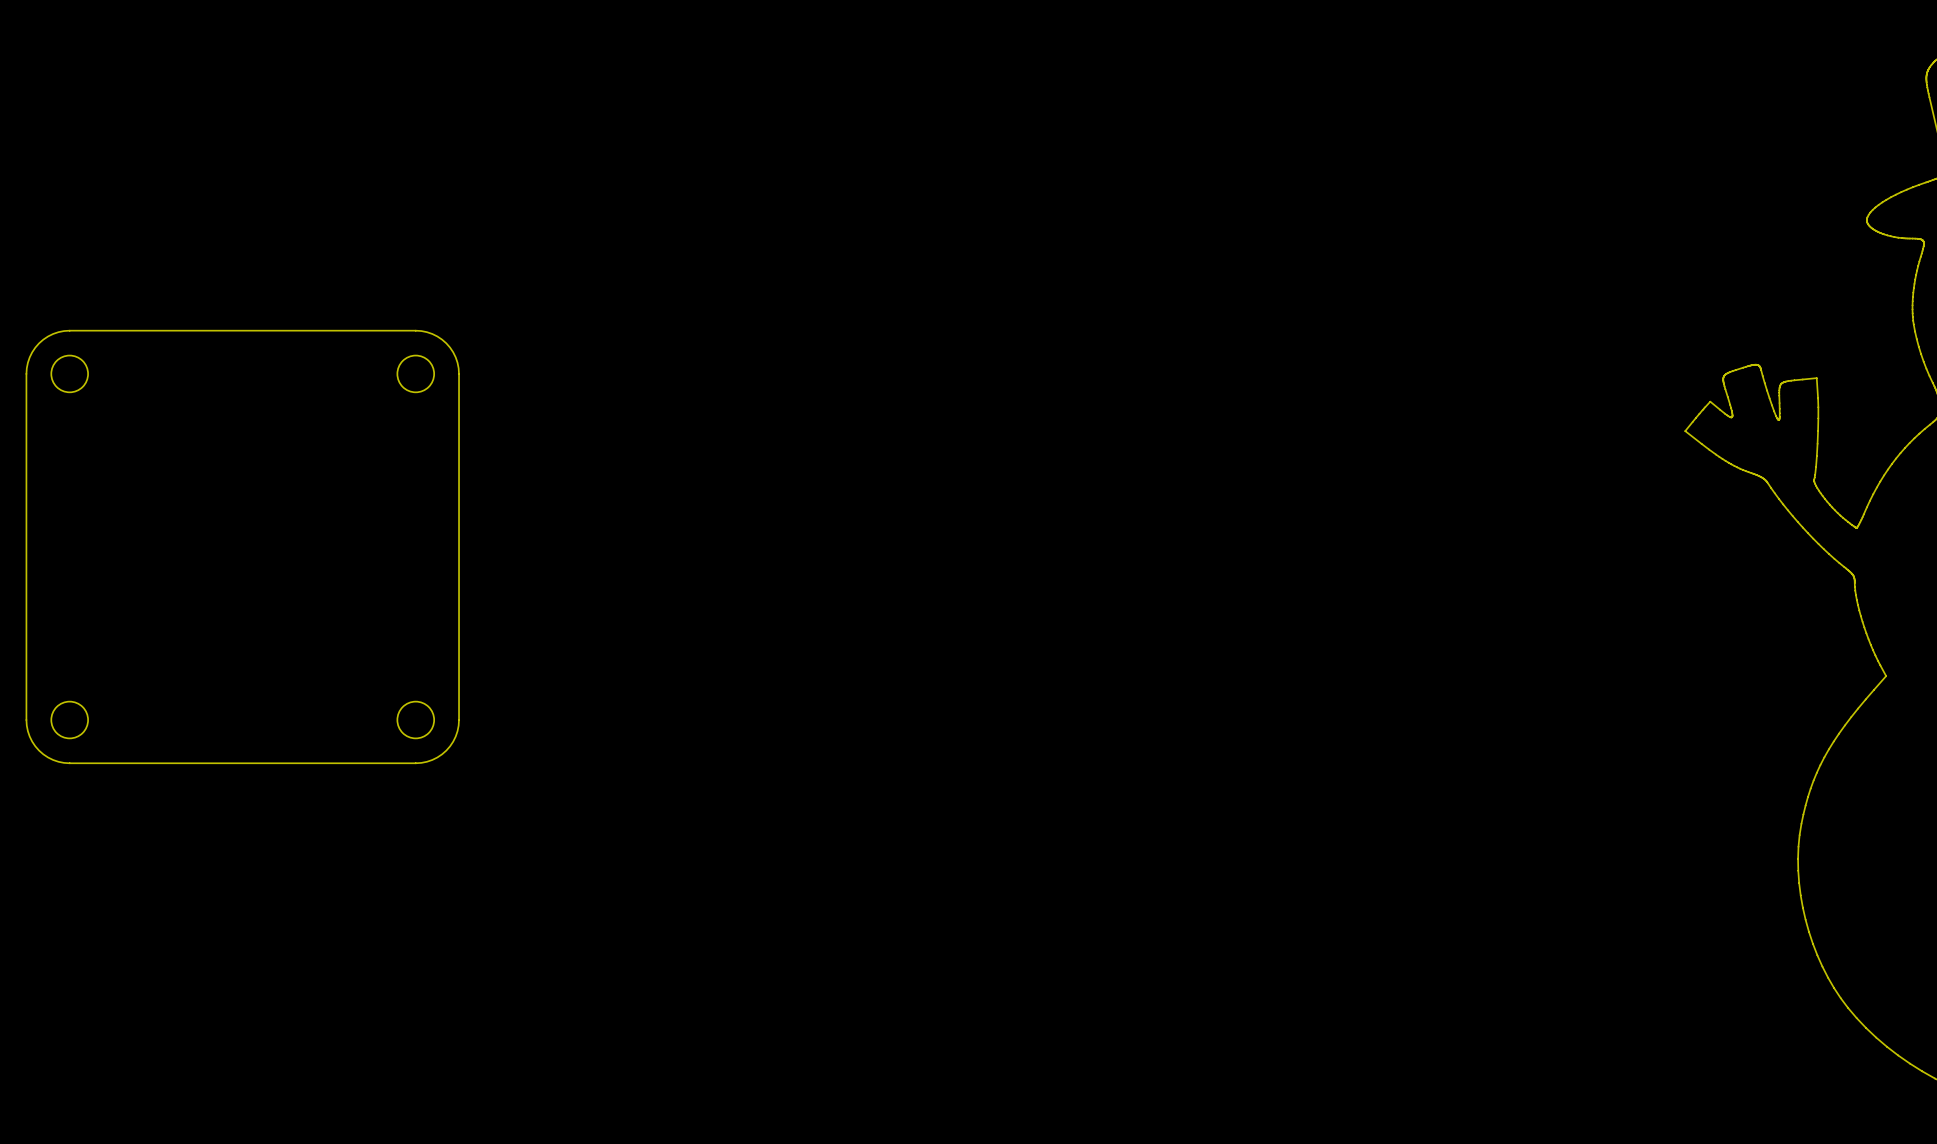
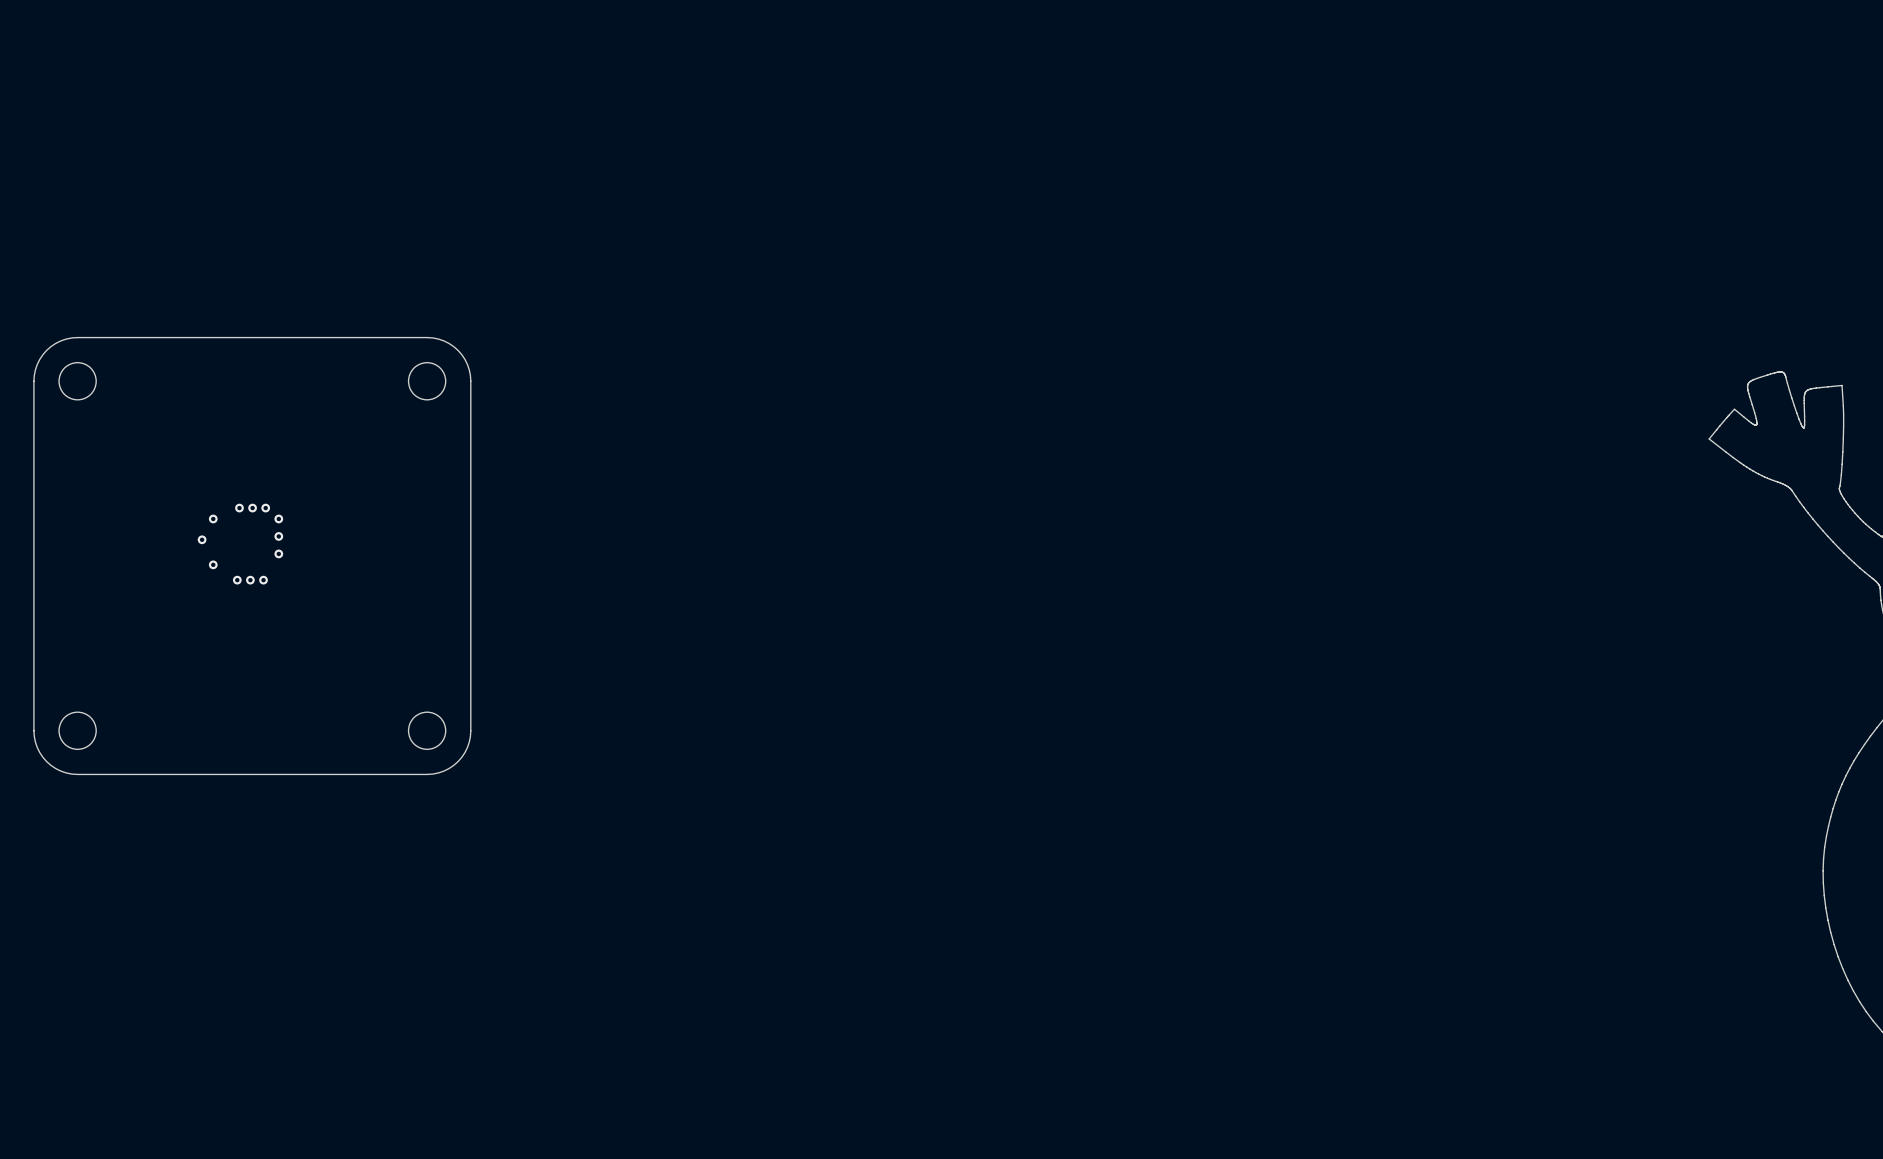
via: none -> (239, 508)
via: none -> (252, 508)
via: none -> (265, 508)
via: none -> (213, 518)
via: none -> (278, 518)
via: none -> (278, 536)
via: none -> (202, 539)
via: none -> (278, 553)
via: none -> (213, 564)
via: none -> (237, 580)
via: none -> (250, 580)
via: none -> (263, 580)

